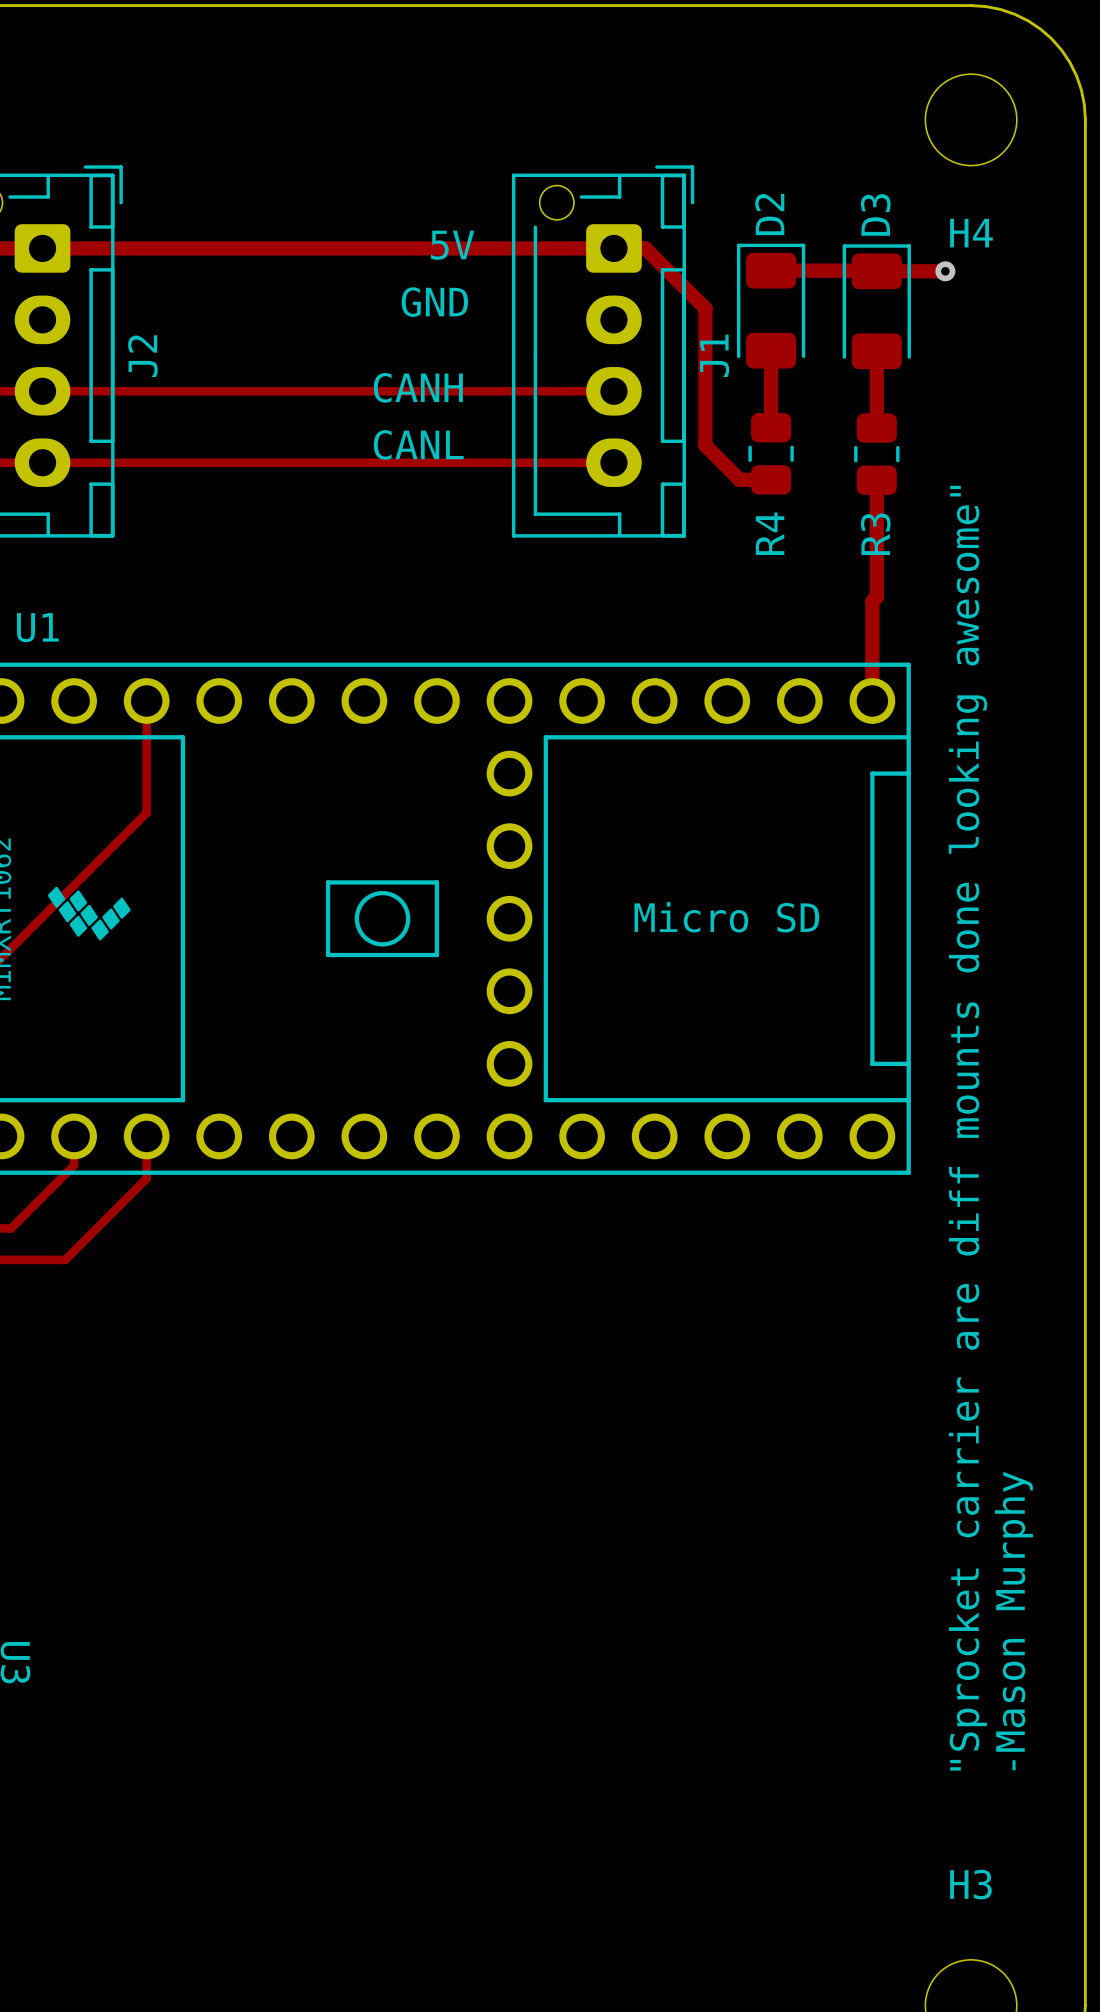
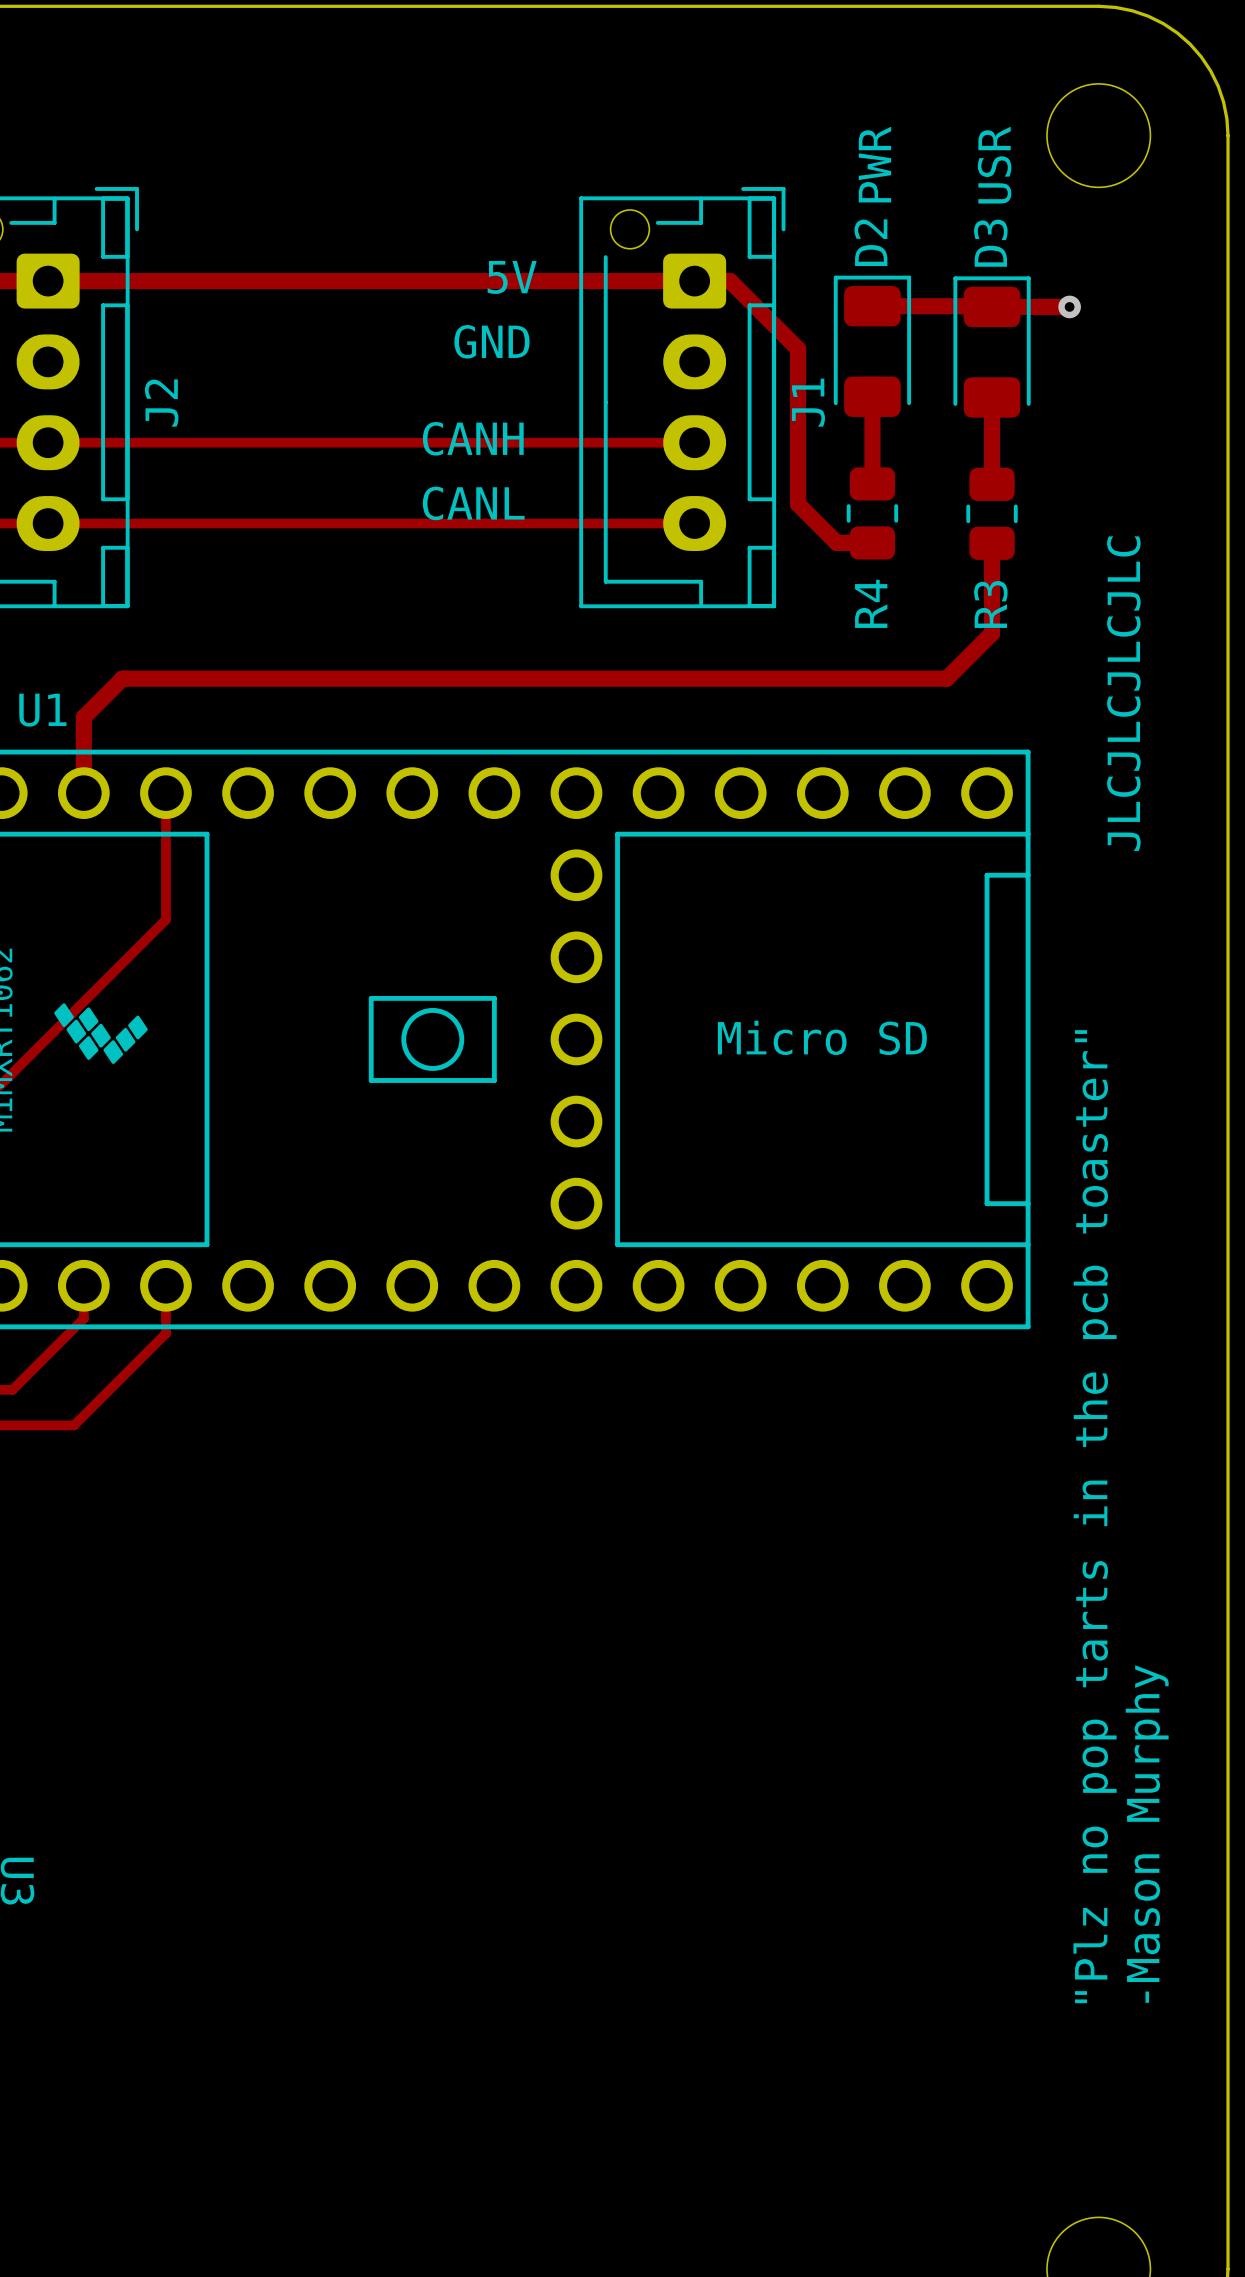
text: none -> PWR (874, 164)
text: none -> USR (994, 165)
H4 name: H4 (971, 233) -> none
track: (876, 559) (876, 597) (872, 601) (872, 701) -> (992, 633) (946, 678) (122, 678) (83, 717) (83, 793)
text: none -> JLCJLCJLCJLC (1123, 693)
text: "Sprocket carrier are diff mounts done looking awesome" (967, 1128) -> "Plz no pop tarts in the pcb toaster" (1095, 1516)
H3 name: H3 (970, 1884) -> none

